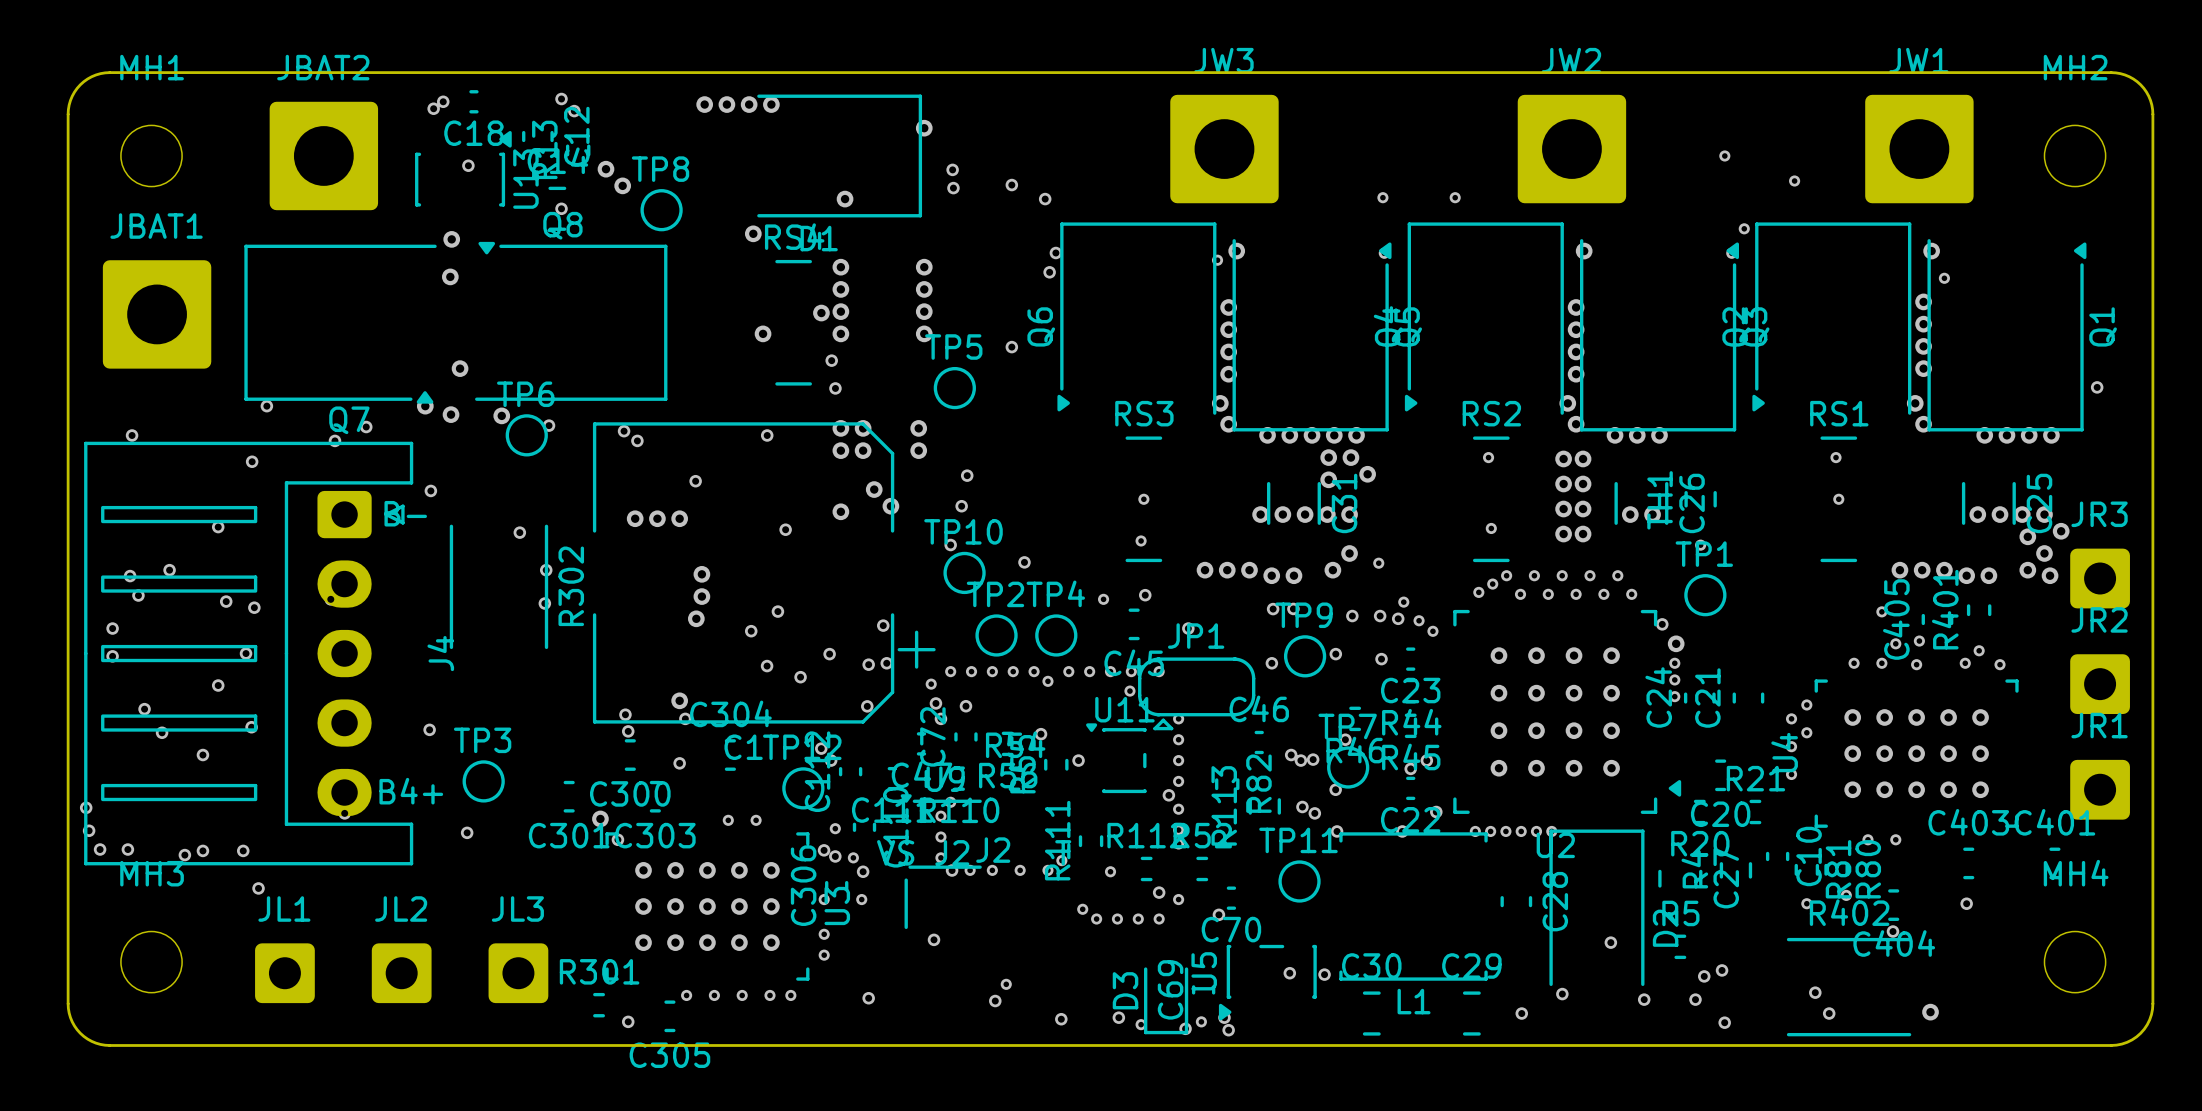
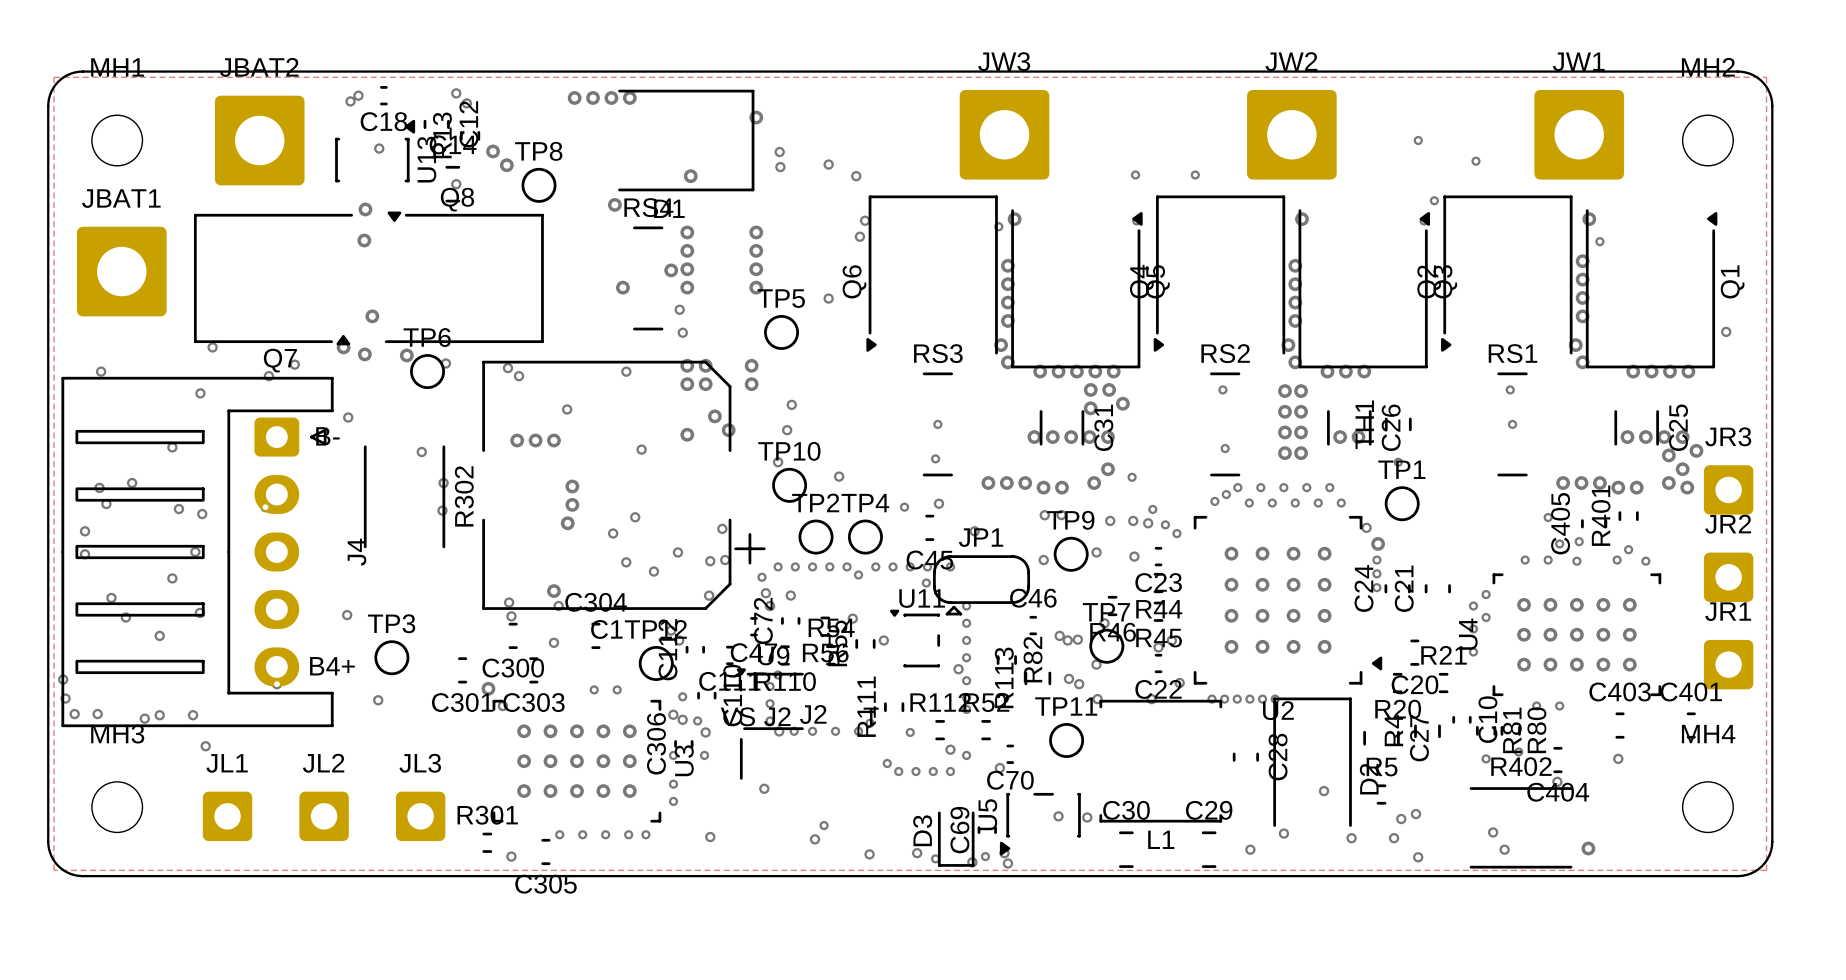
zone outline: none -> (53, 77) (1766, 77) (1766, 870) (53, 870) (53, 77)

